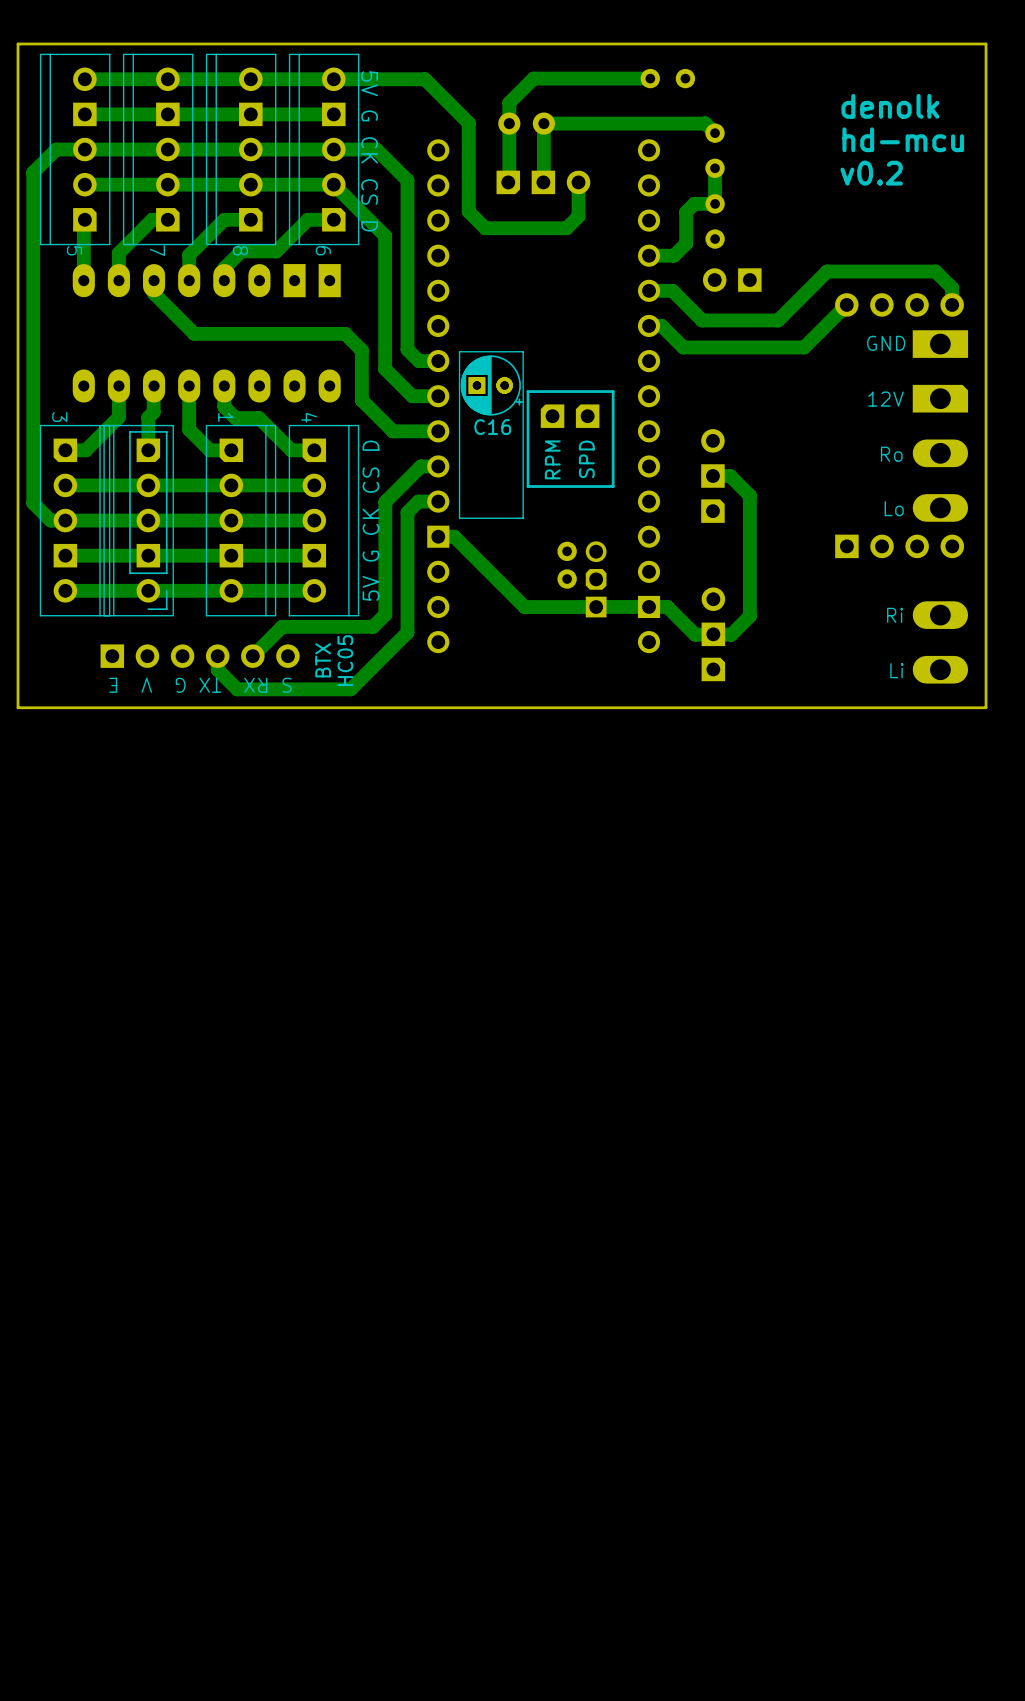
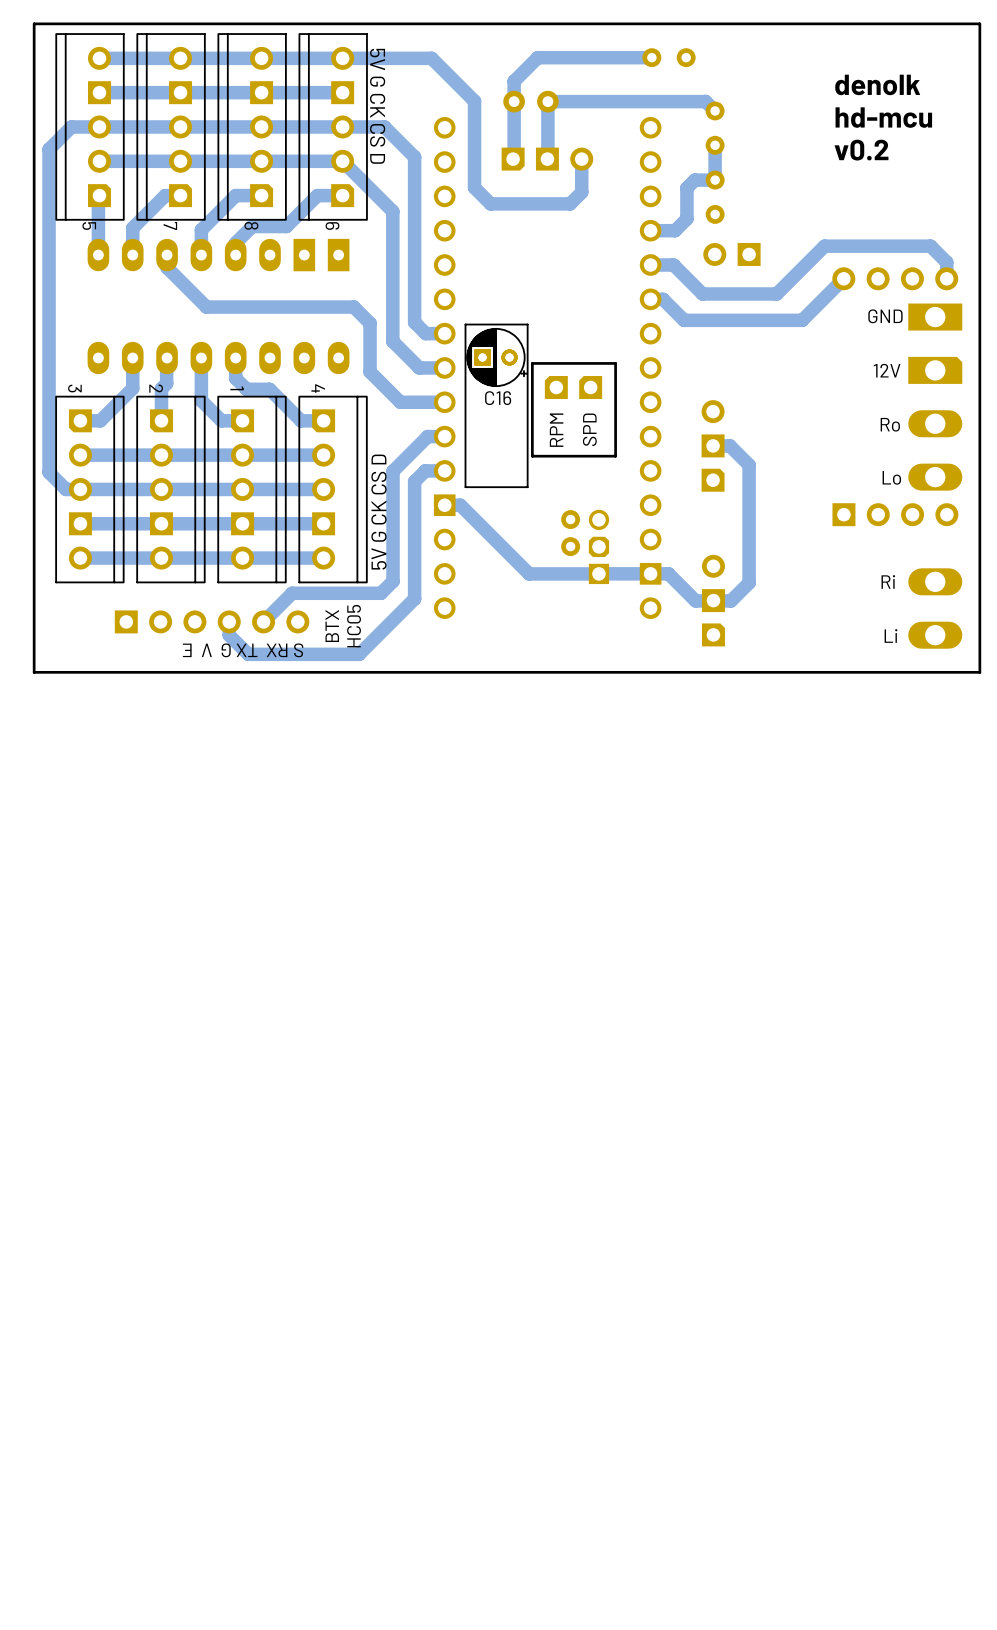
2 side: bottom (138, 520) -> top (170, 489)

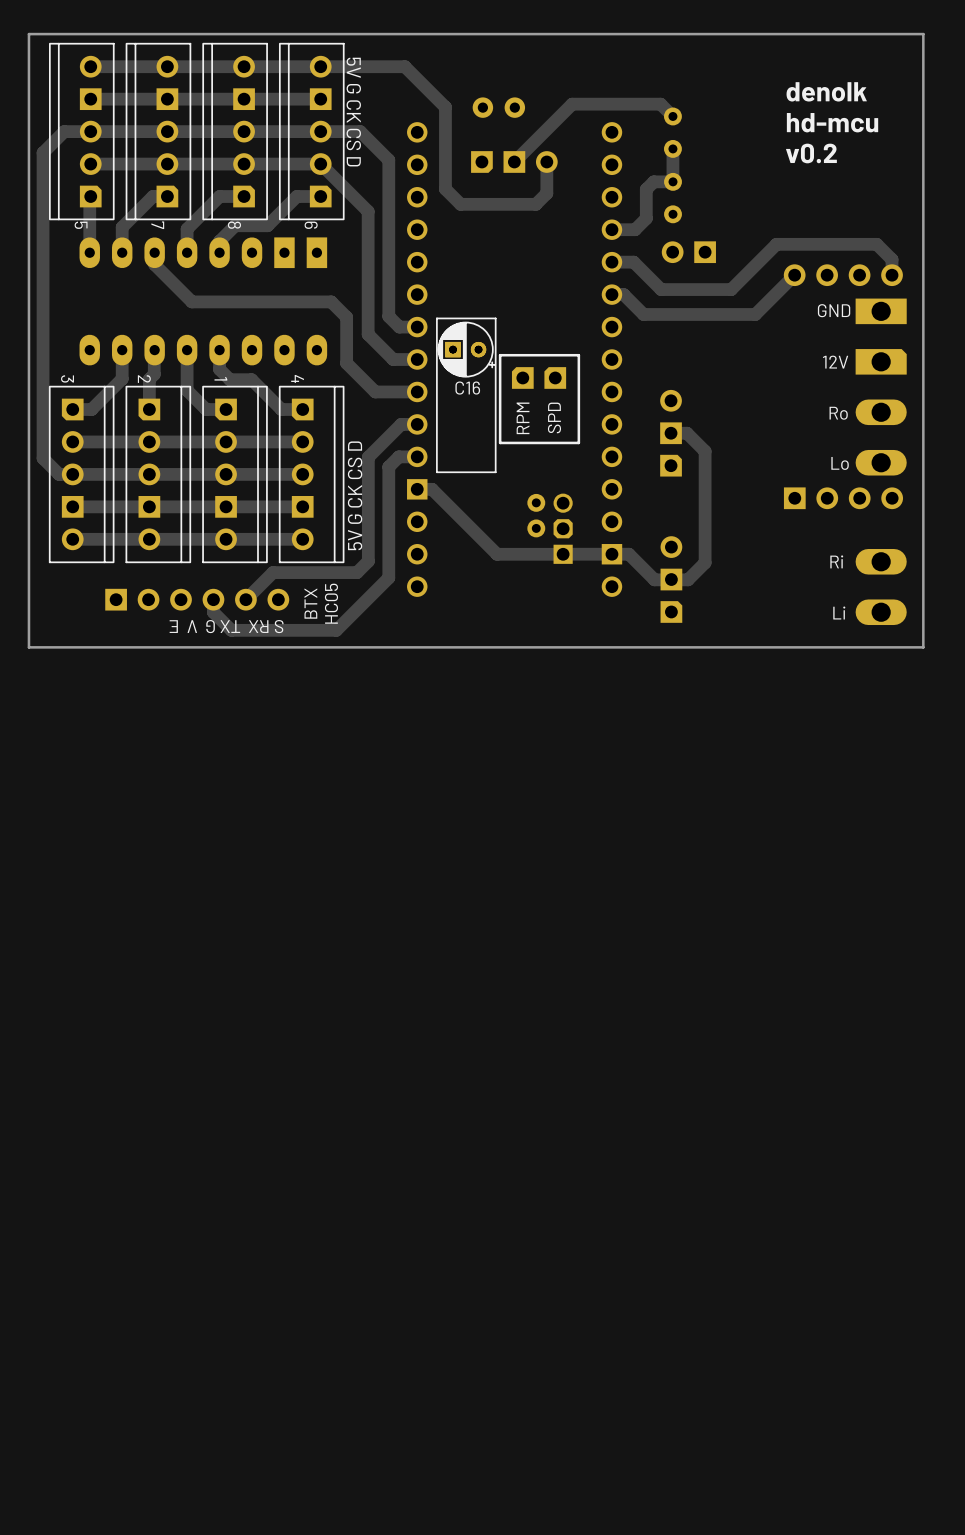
track: (651, 57) (537, 57) (514, 81) (513, 159) -> none
part: (669, 57) -> none
track: (705, 101) (547, 101) (547, 158) -> (663, 107) (660, 104) (572, 104) (514, 161)

